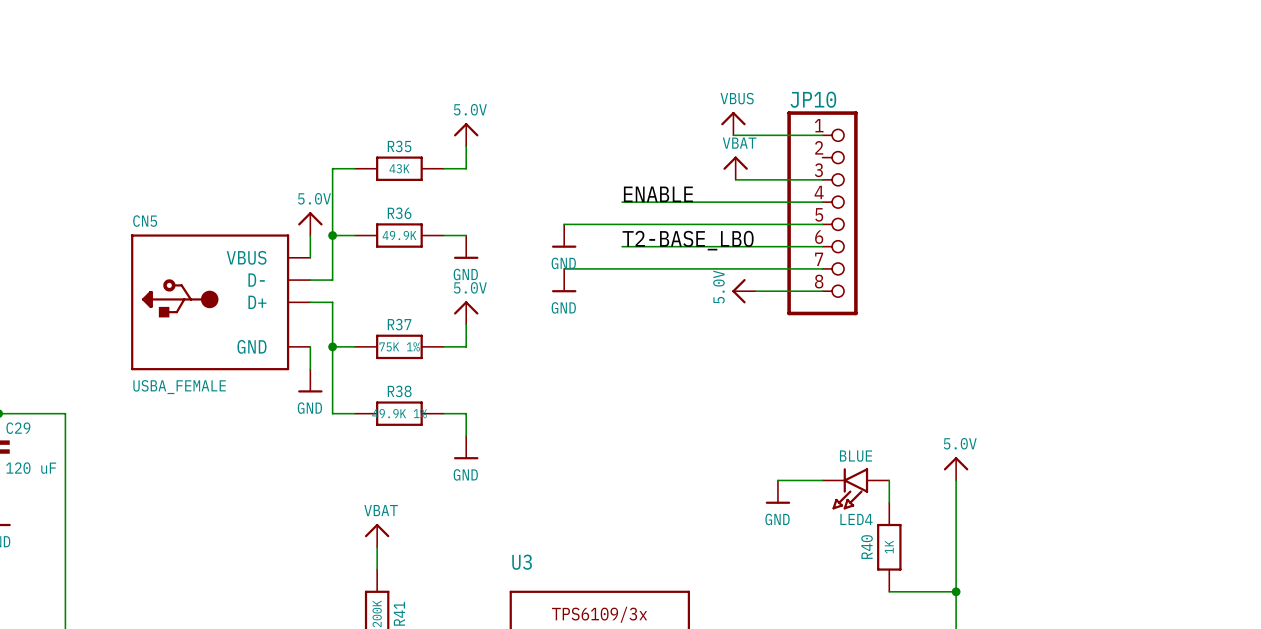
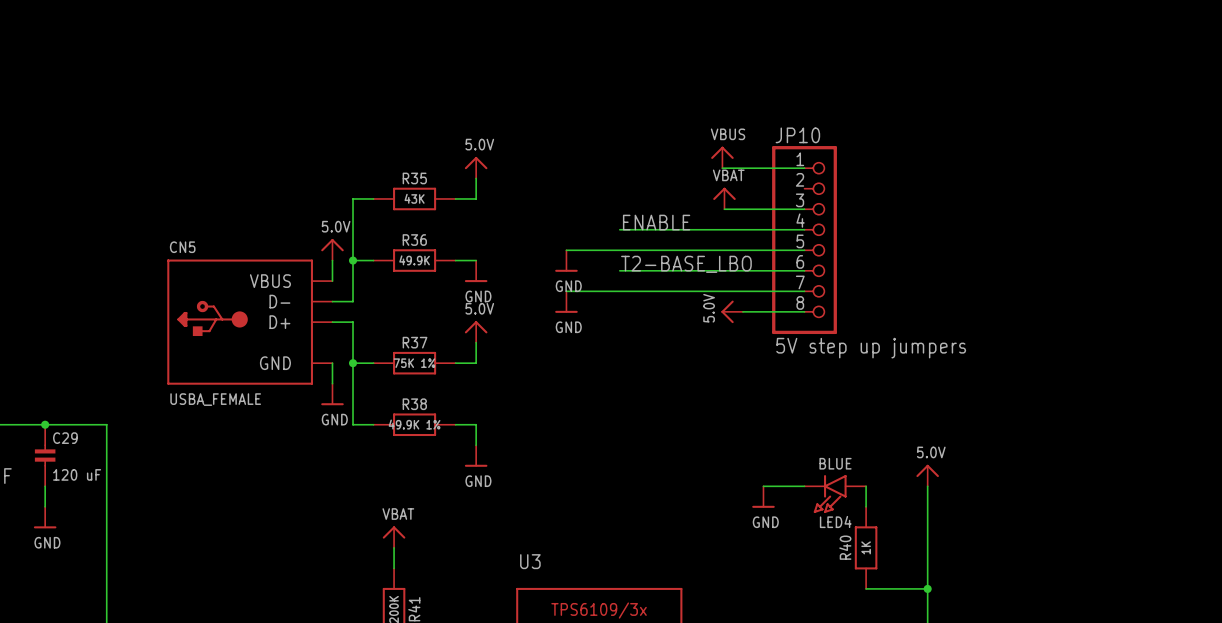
JP10 value: none -> 5V step up jumpers (871, 348)

